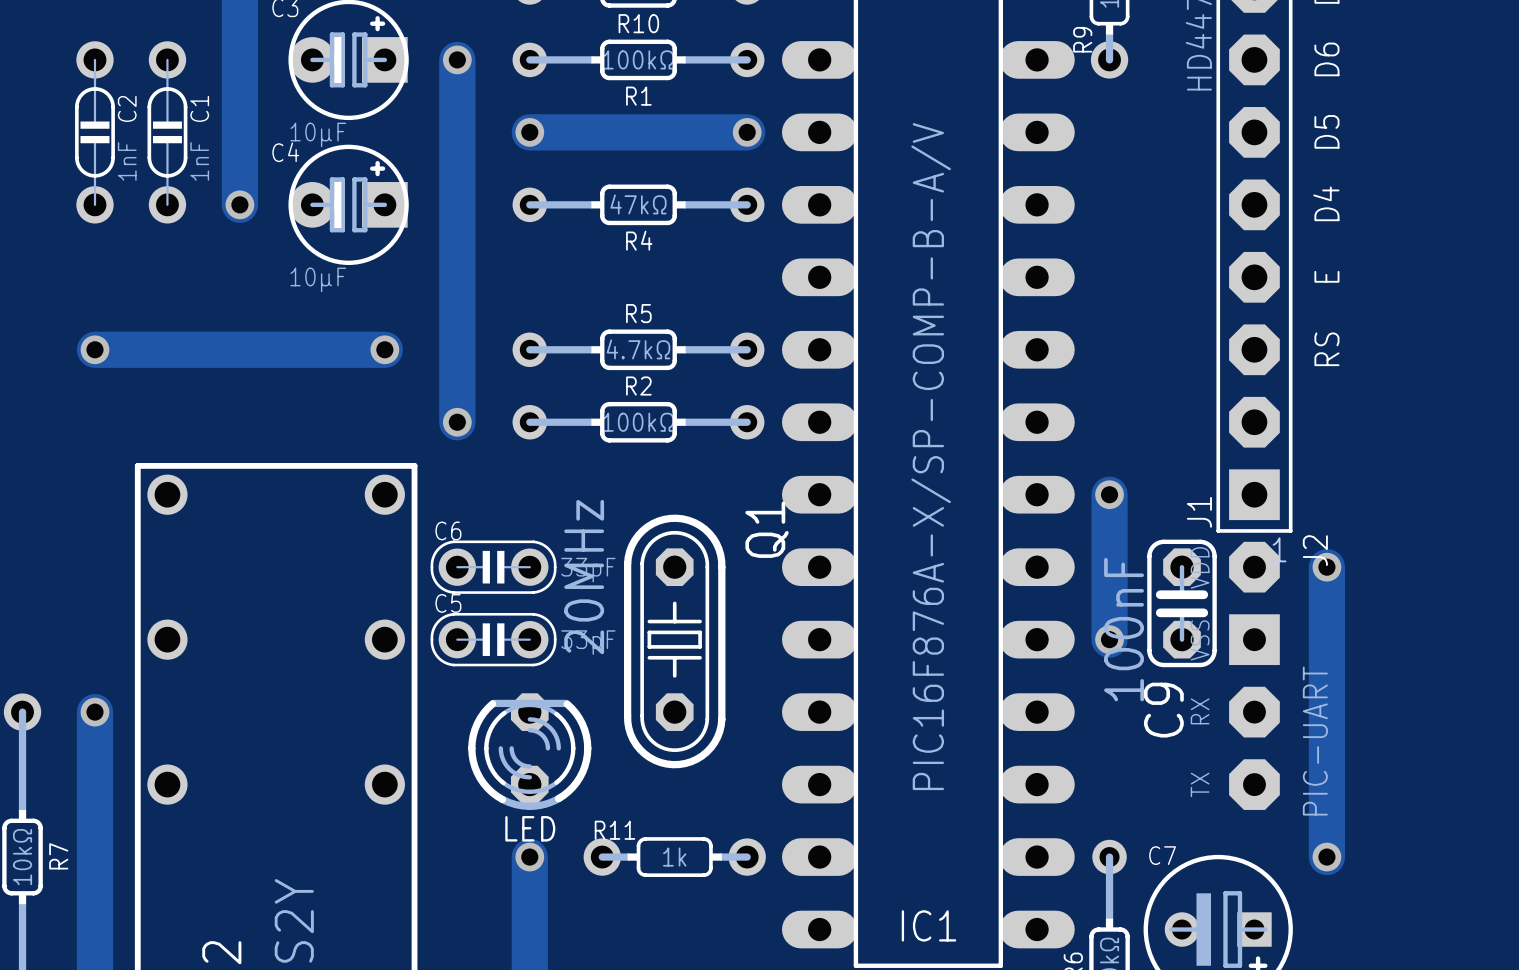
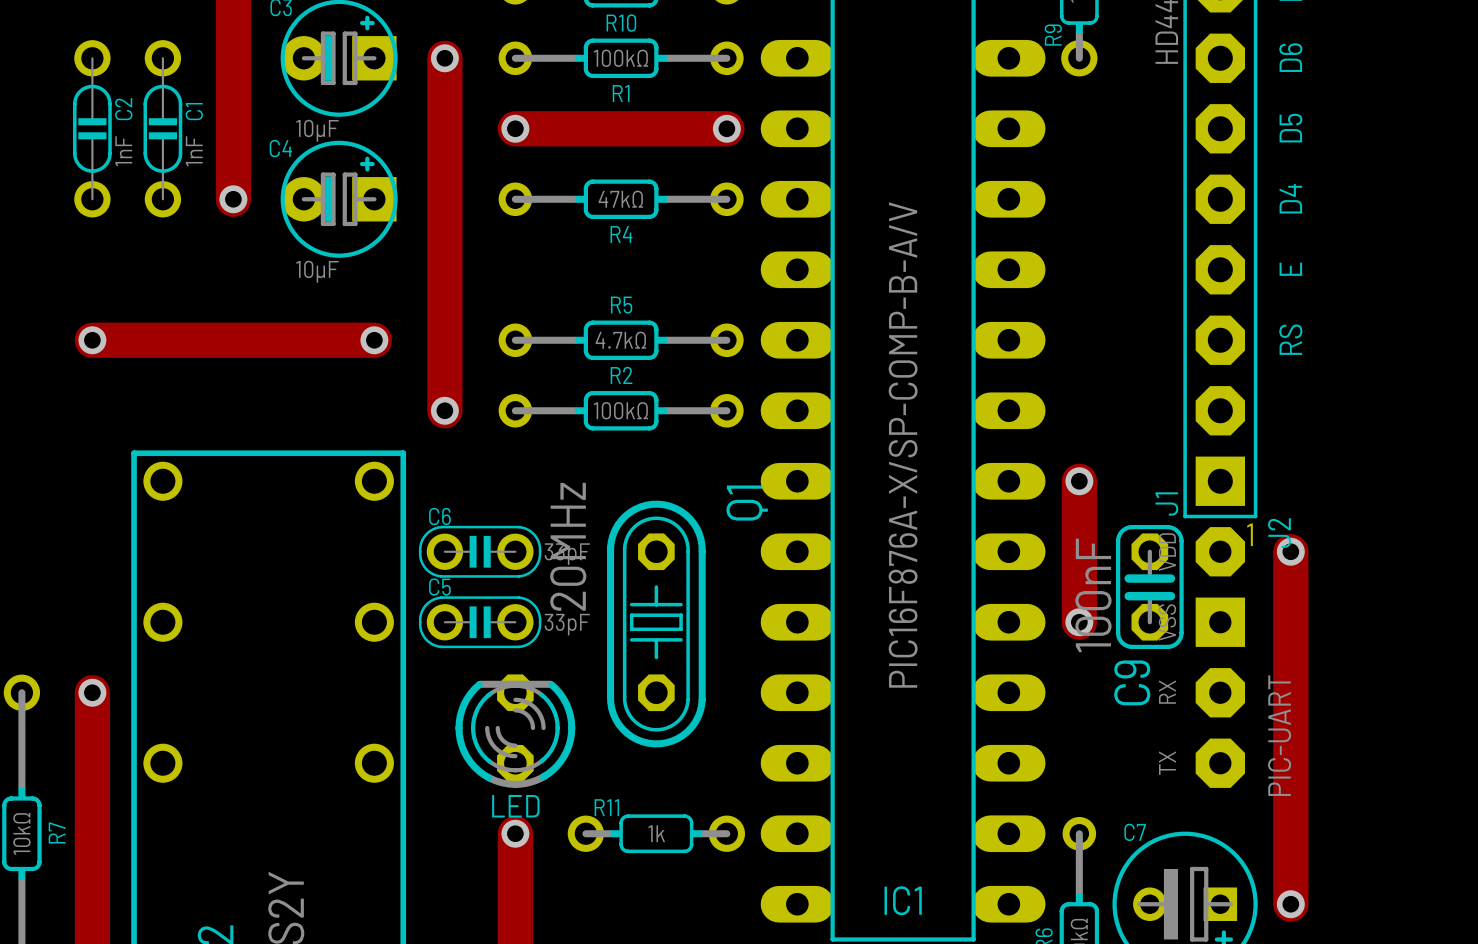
track: none -> (1290, 833) (1290, 904)
via position: (1326, 857) -> (1290, 904)

